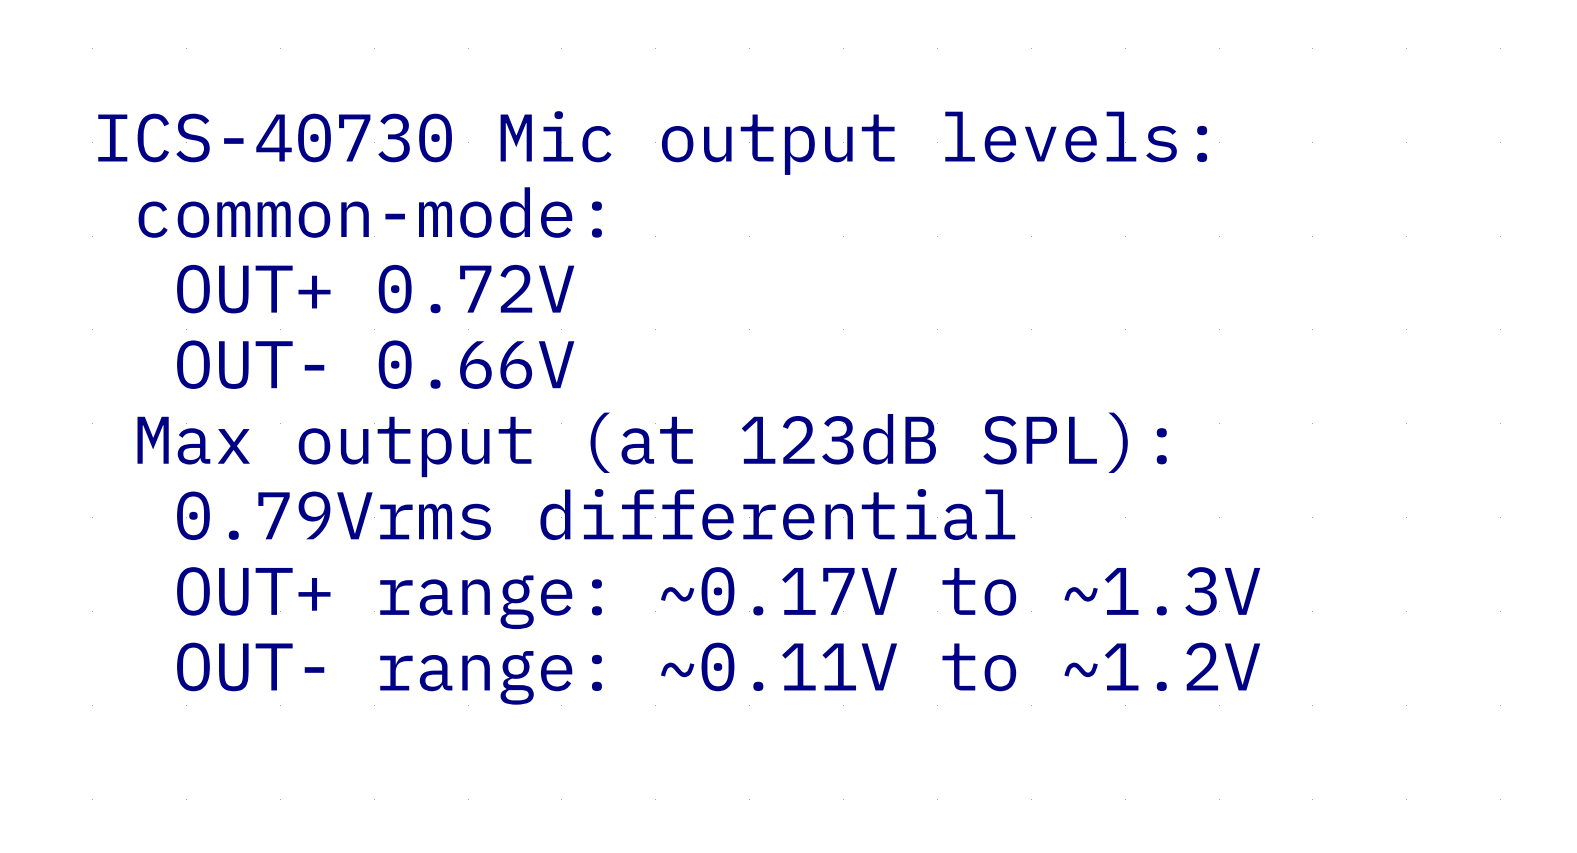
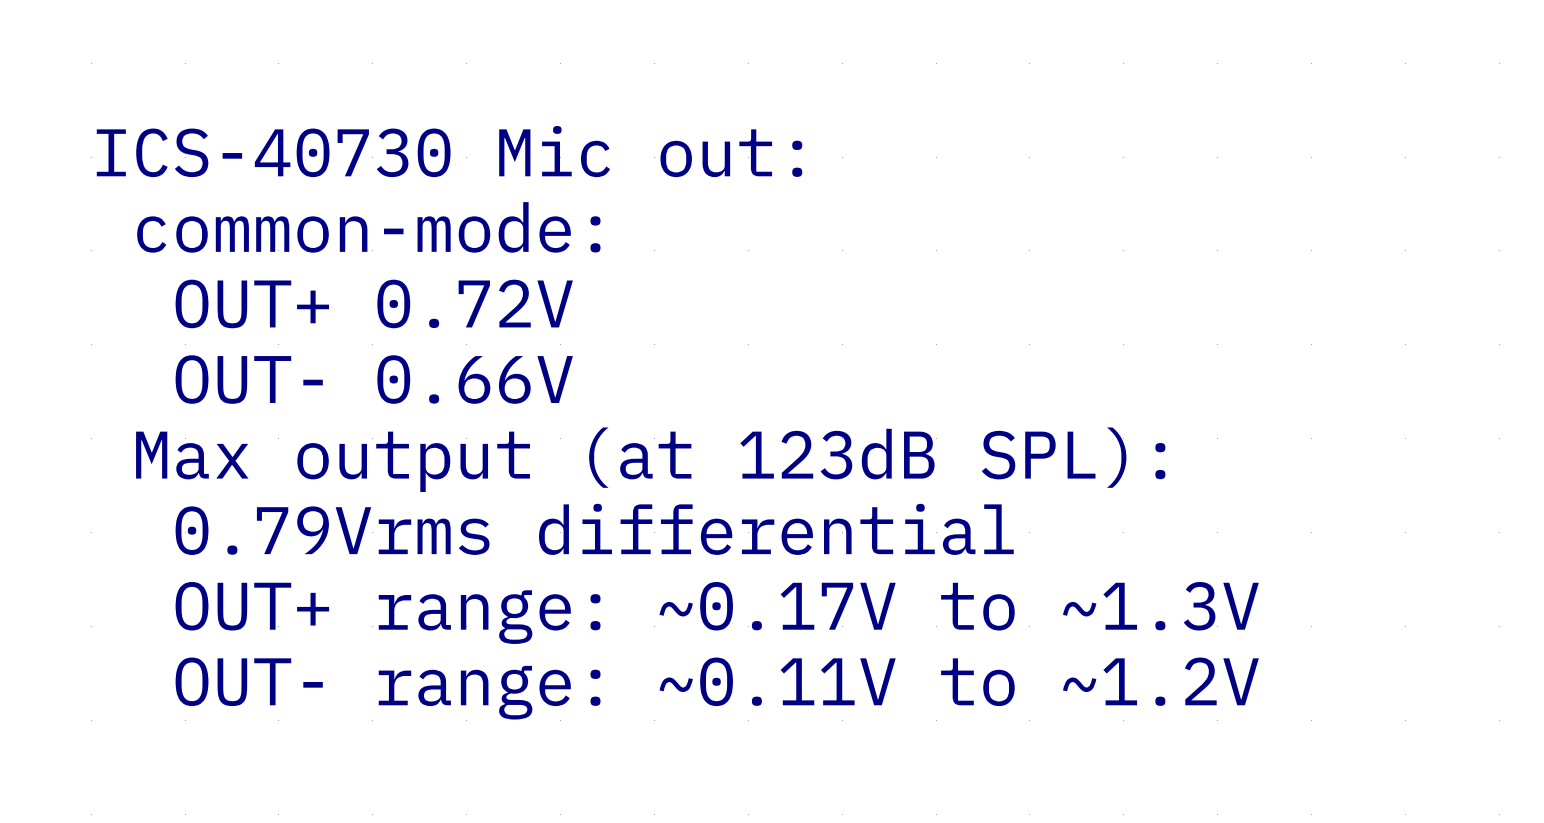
text: ICS-40730 Mic output levels: (652, 143) -> ICS-40730 Mic out: (449, 151)

